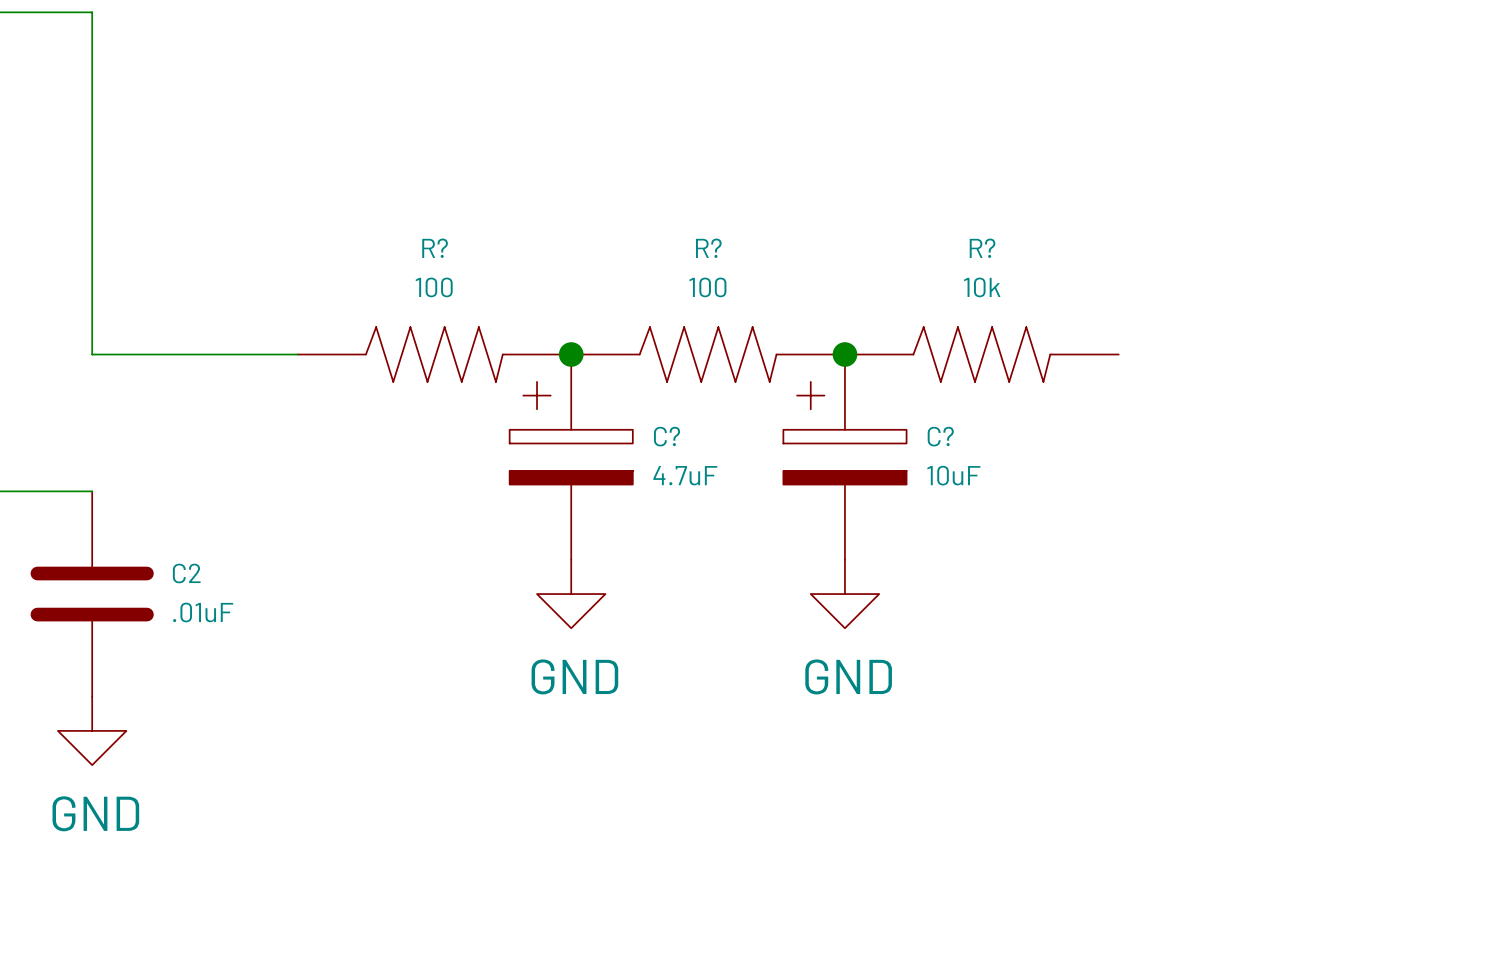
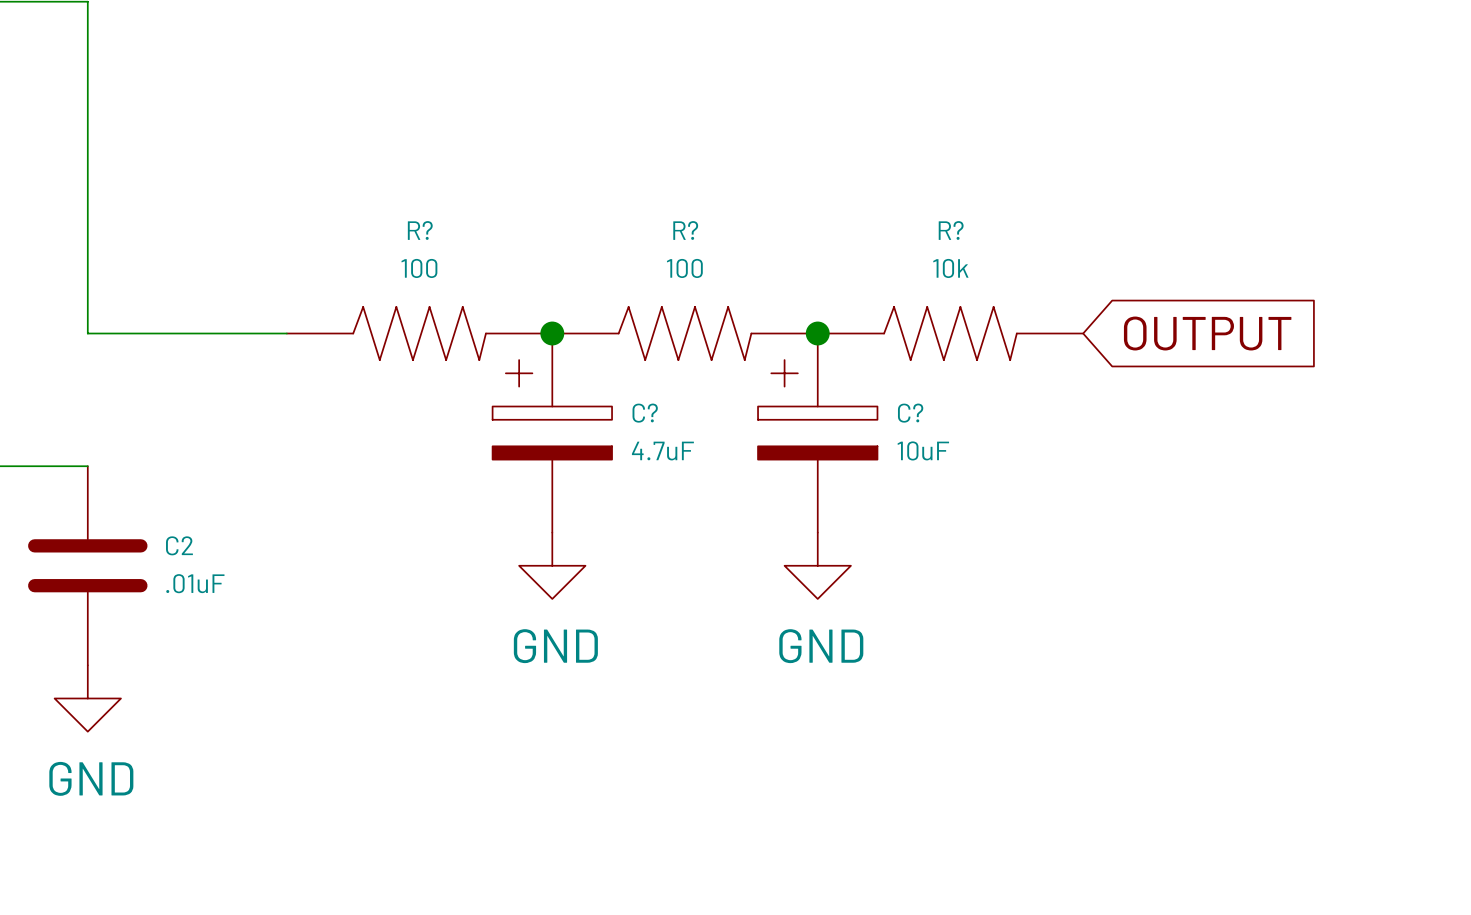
global label: none -> OUTPUT (1207, 333)

